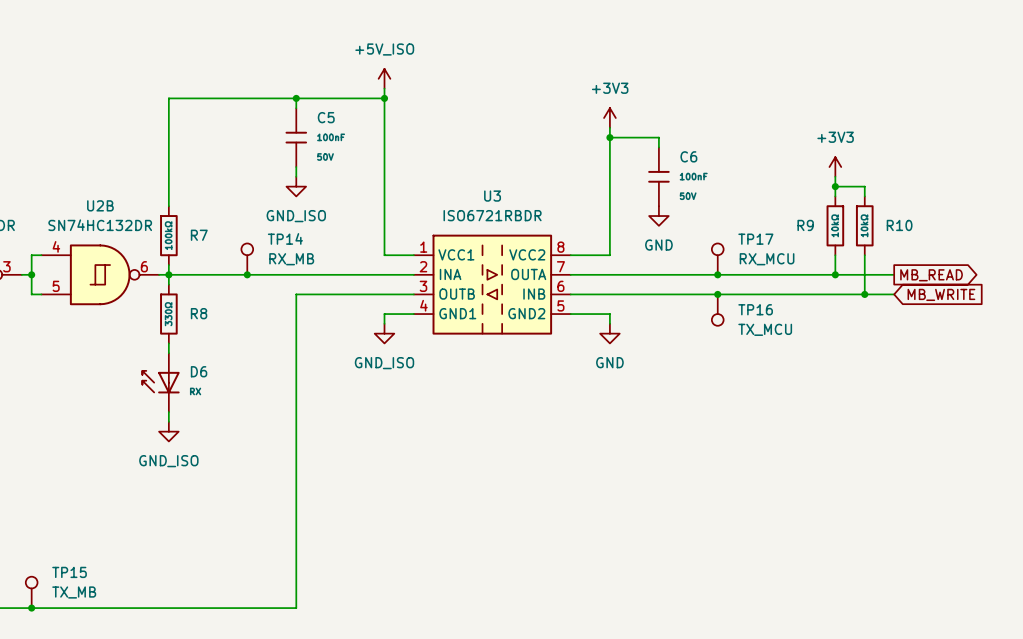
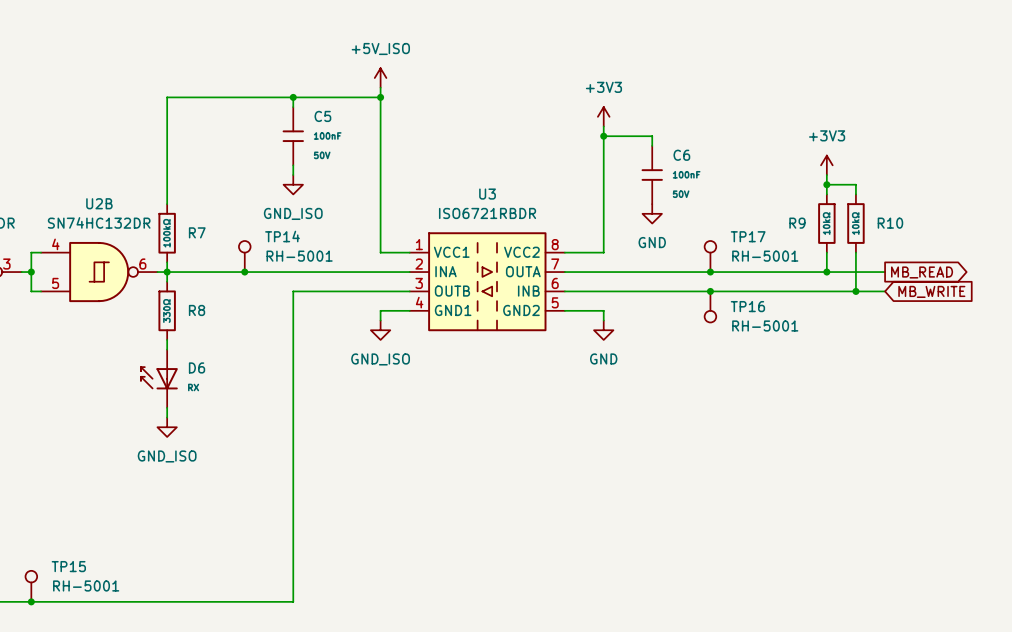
TP14 value: RX_MB (291, 259) -> RH-5001 (299, 256)
TP17 value: RX_MCU (767, 259) -> RH-5001 (765, 256)
TP16 value: TX_MCU (765, 329) -> RH-5001 (765, 325)
TP15 value: TX_MB (74, 592) -> RH-5001 (86, 585)

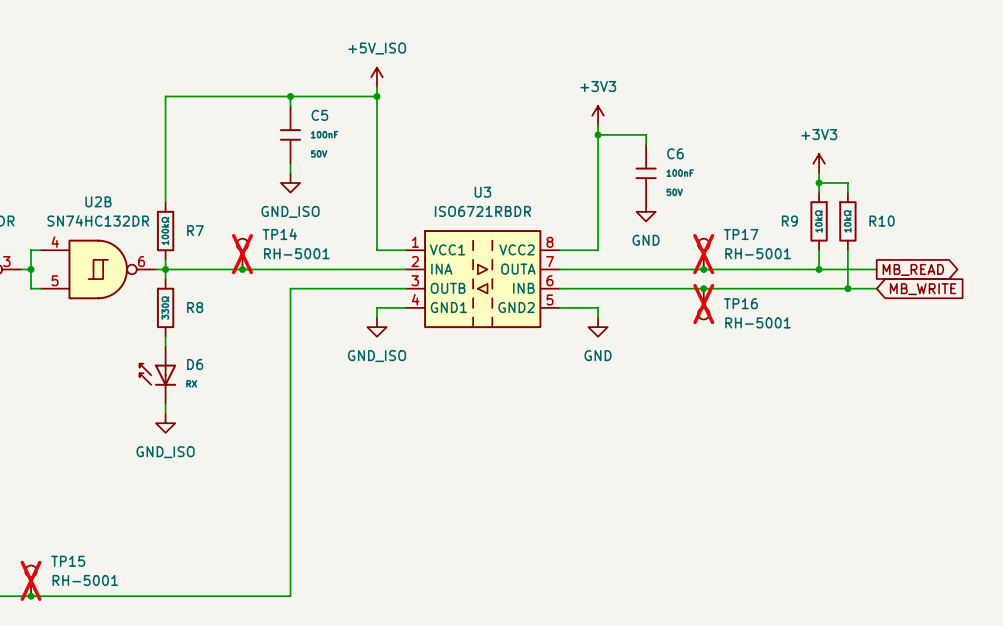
TP14 do-not-place cross: none -> (242, 254)
TP17 do-not-place cross: none -> (703, 254)
TP16 do-not-place cross: none -> (703, 304)
TP15 do-not-place cross: none -> (31, 580)

